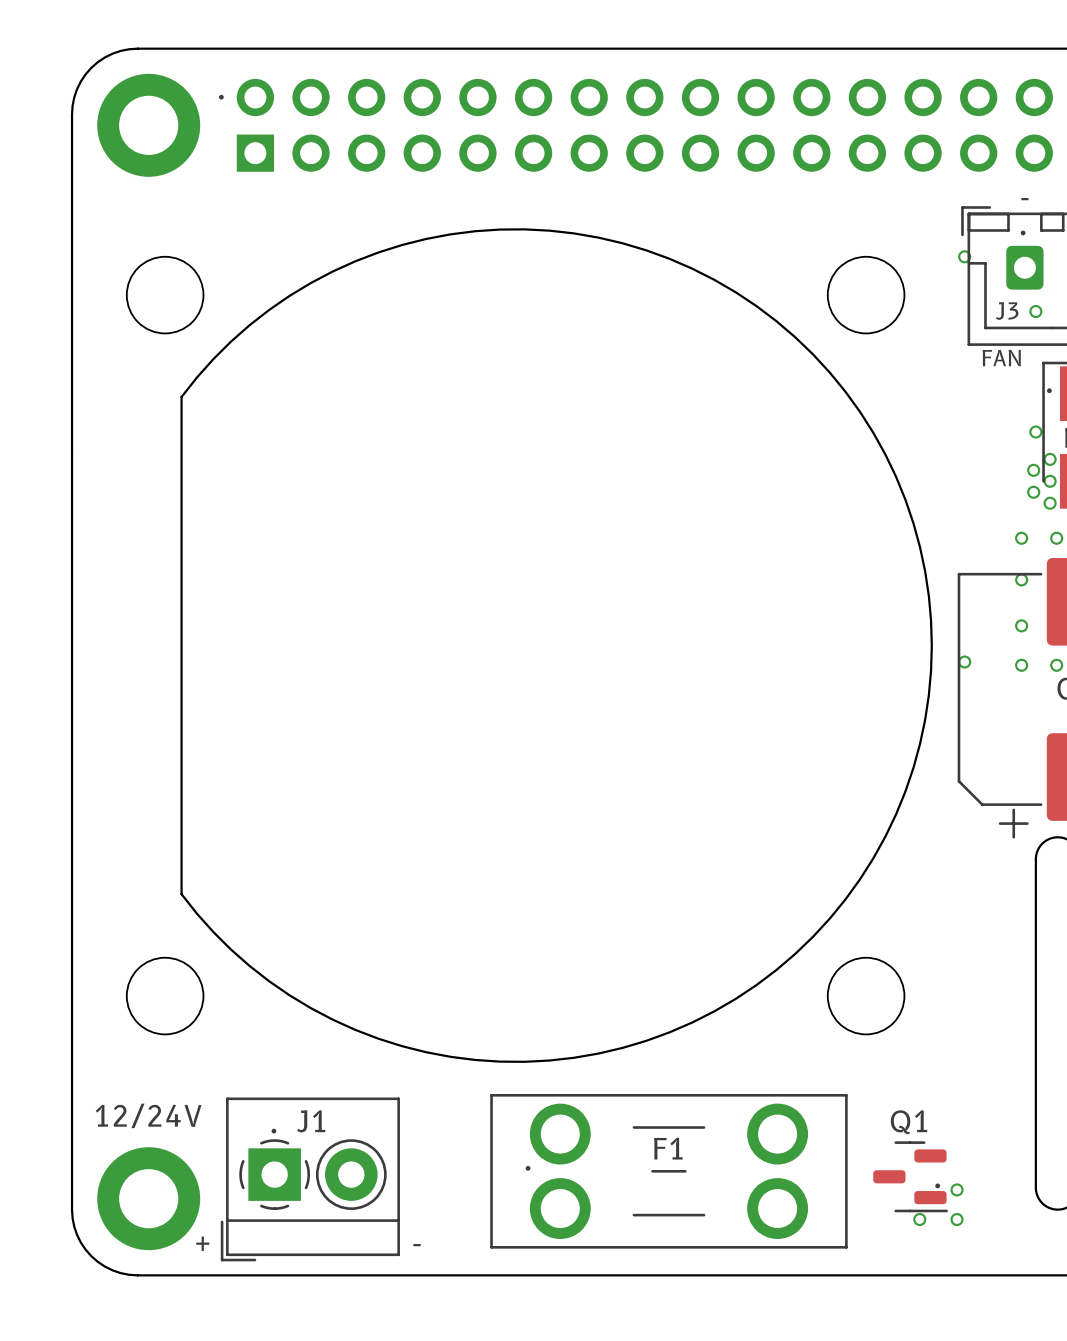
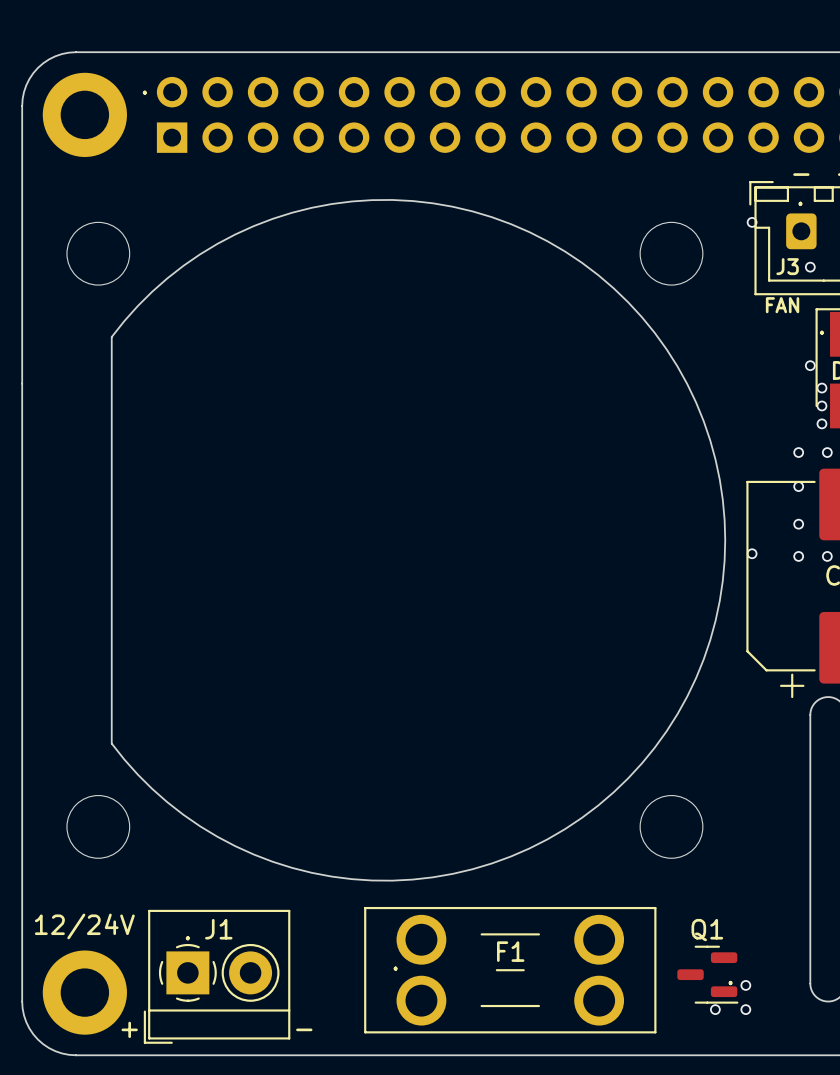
via: (1033, 470) -> none
via: (1033, 492) -> none

